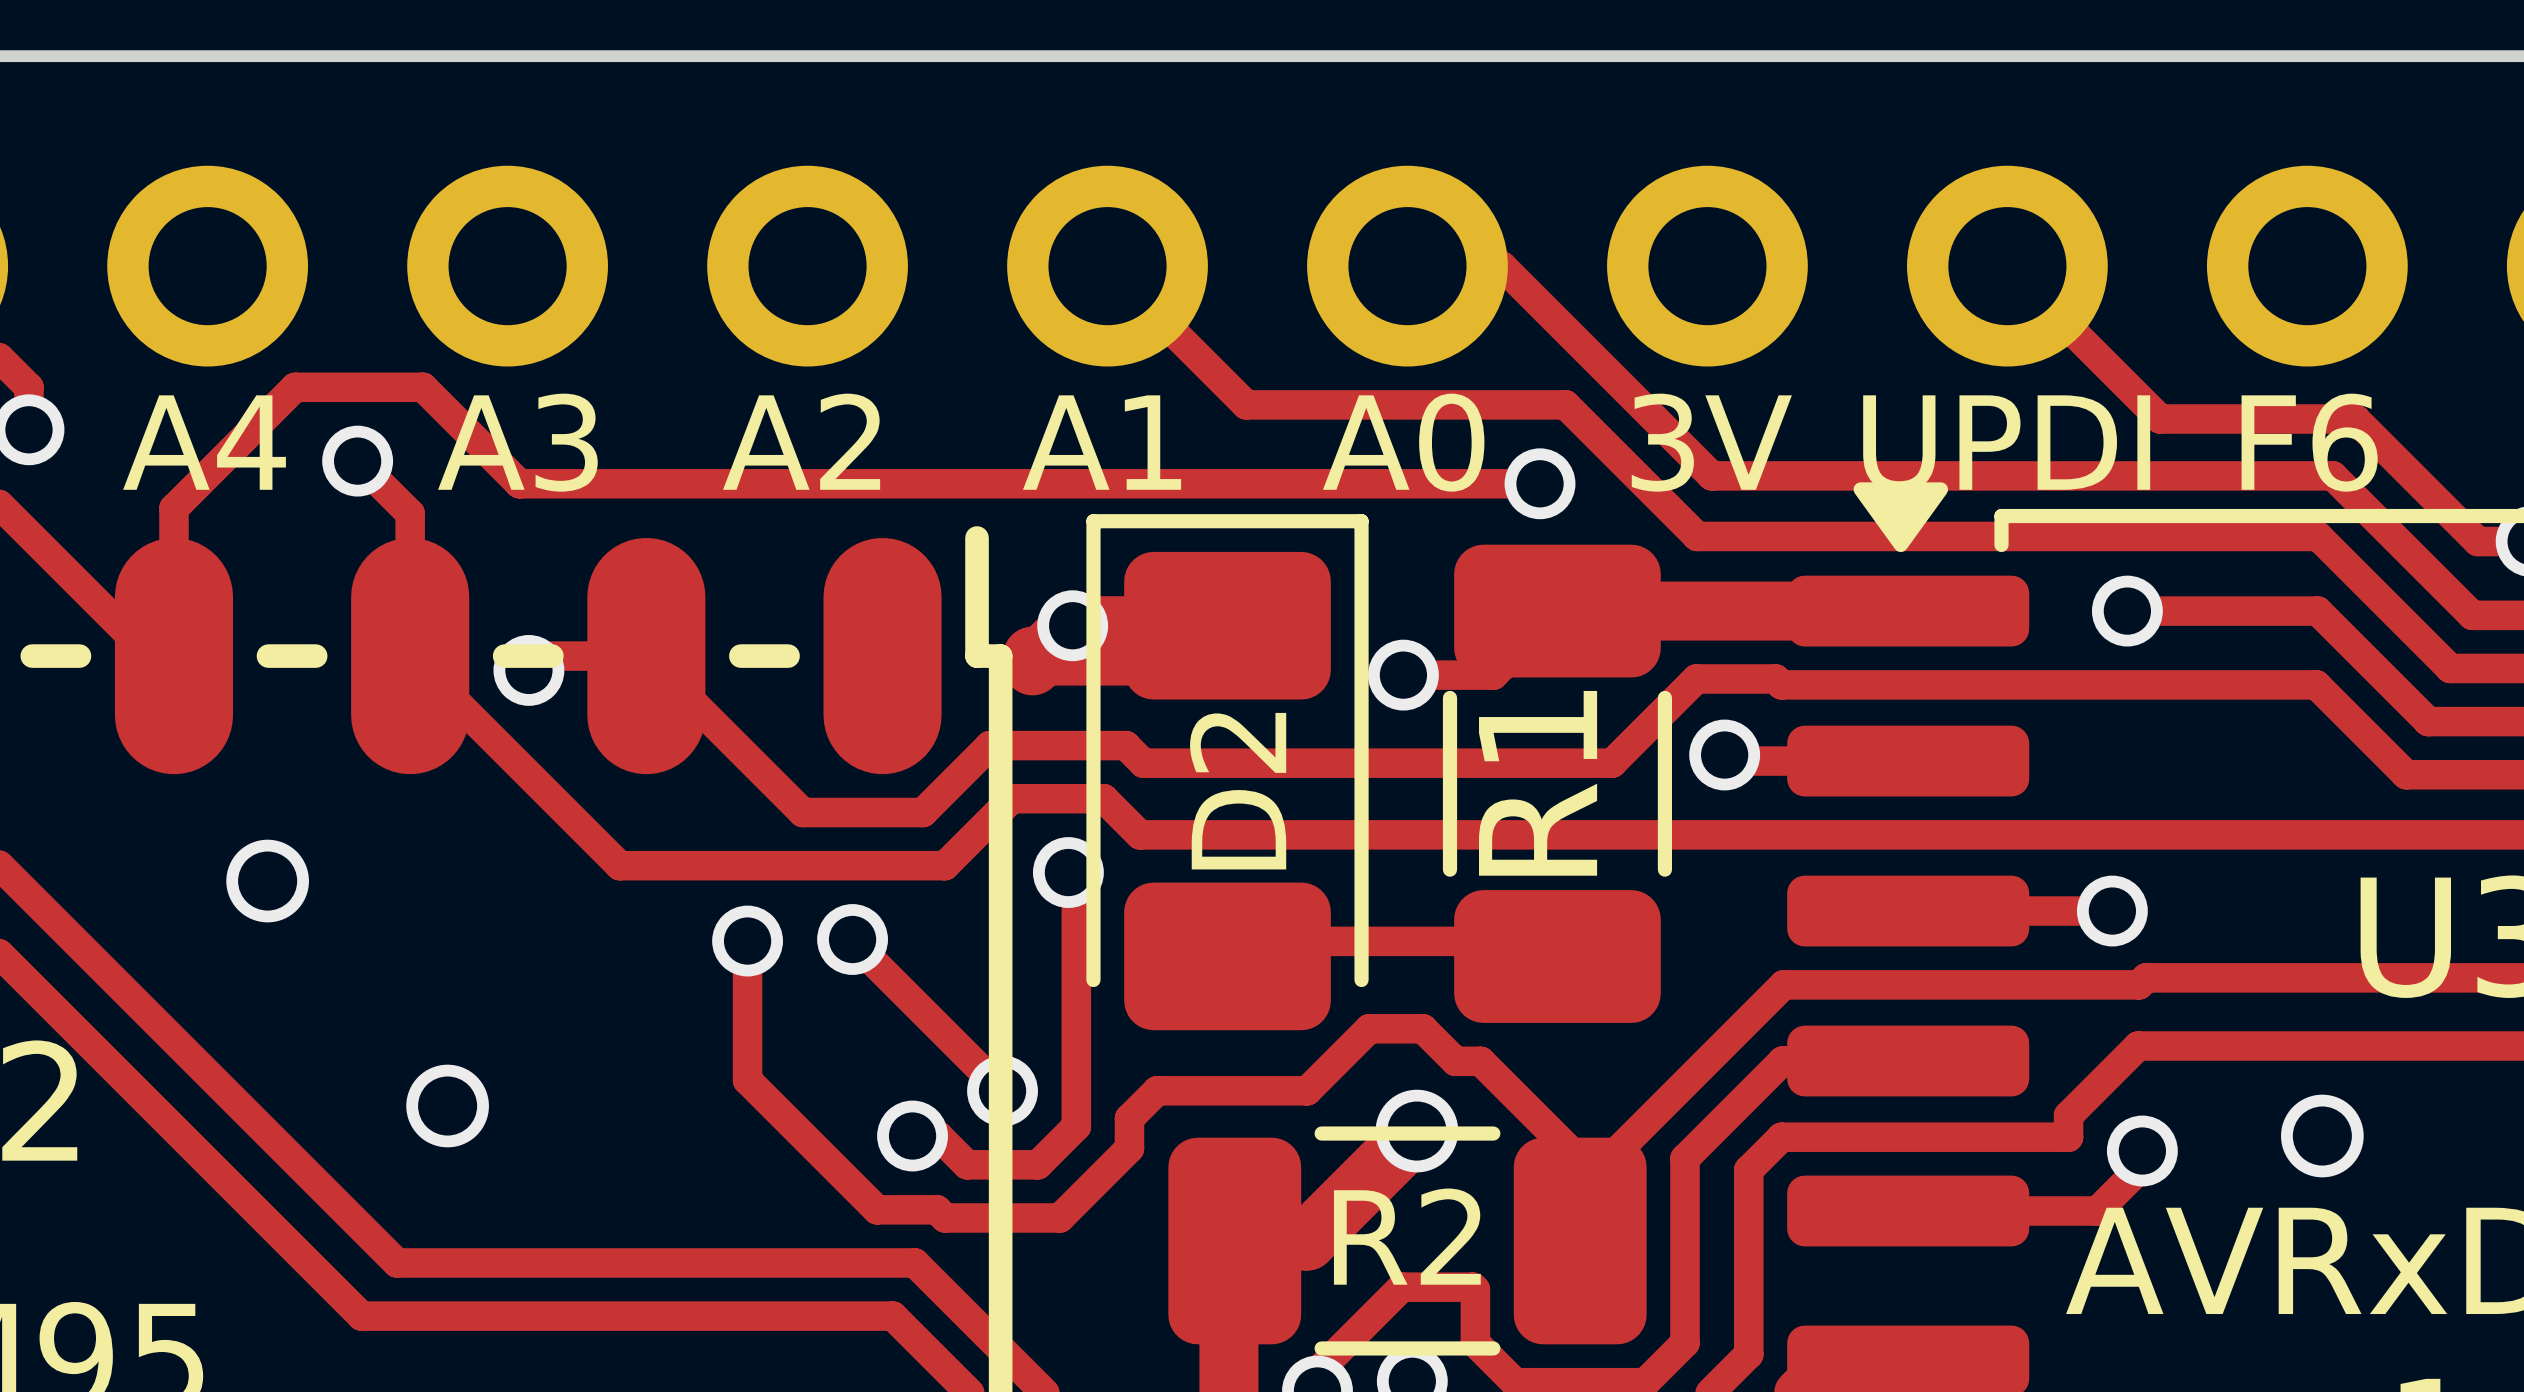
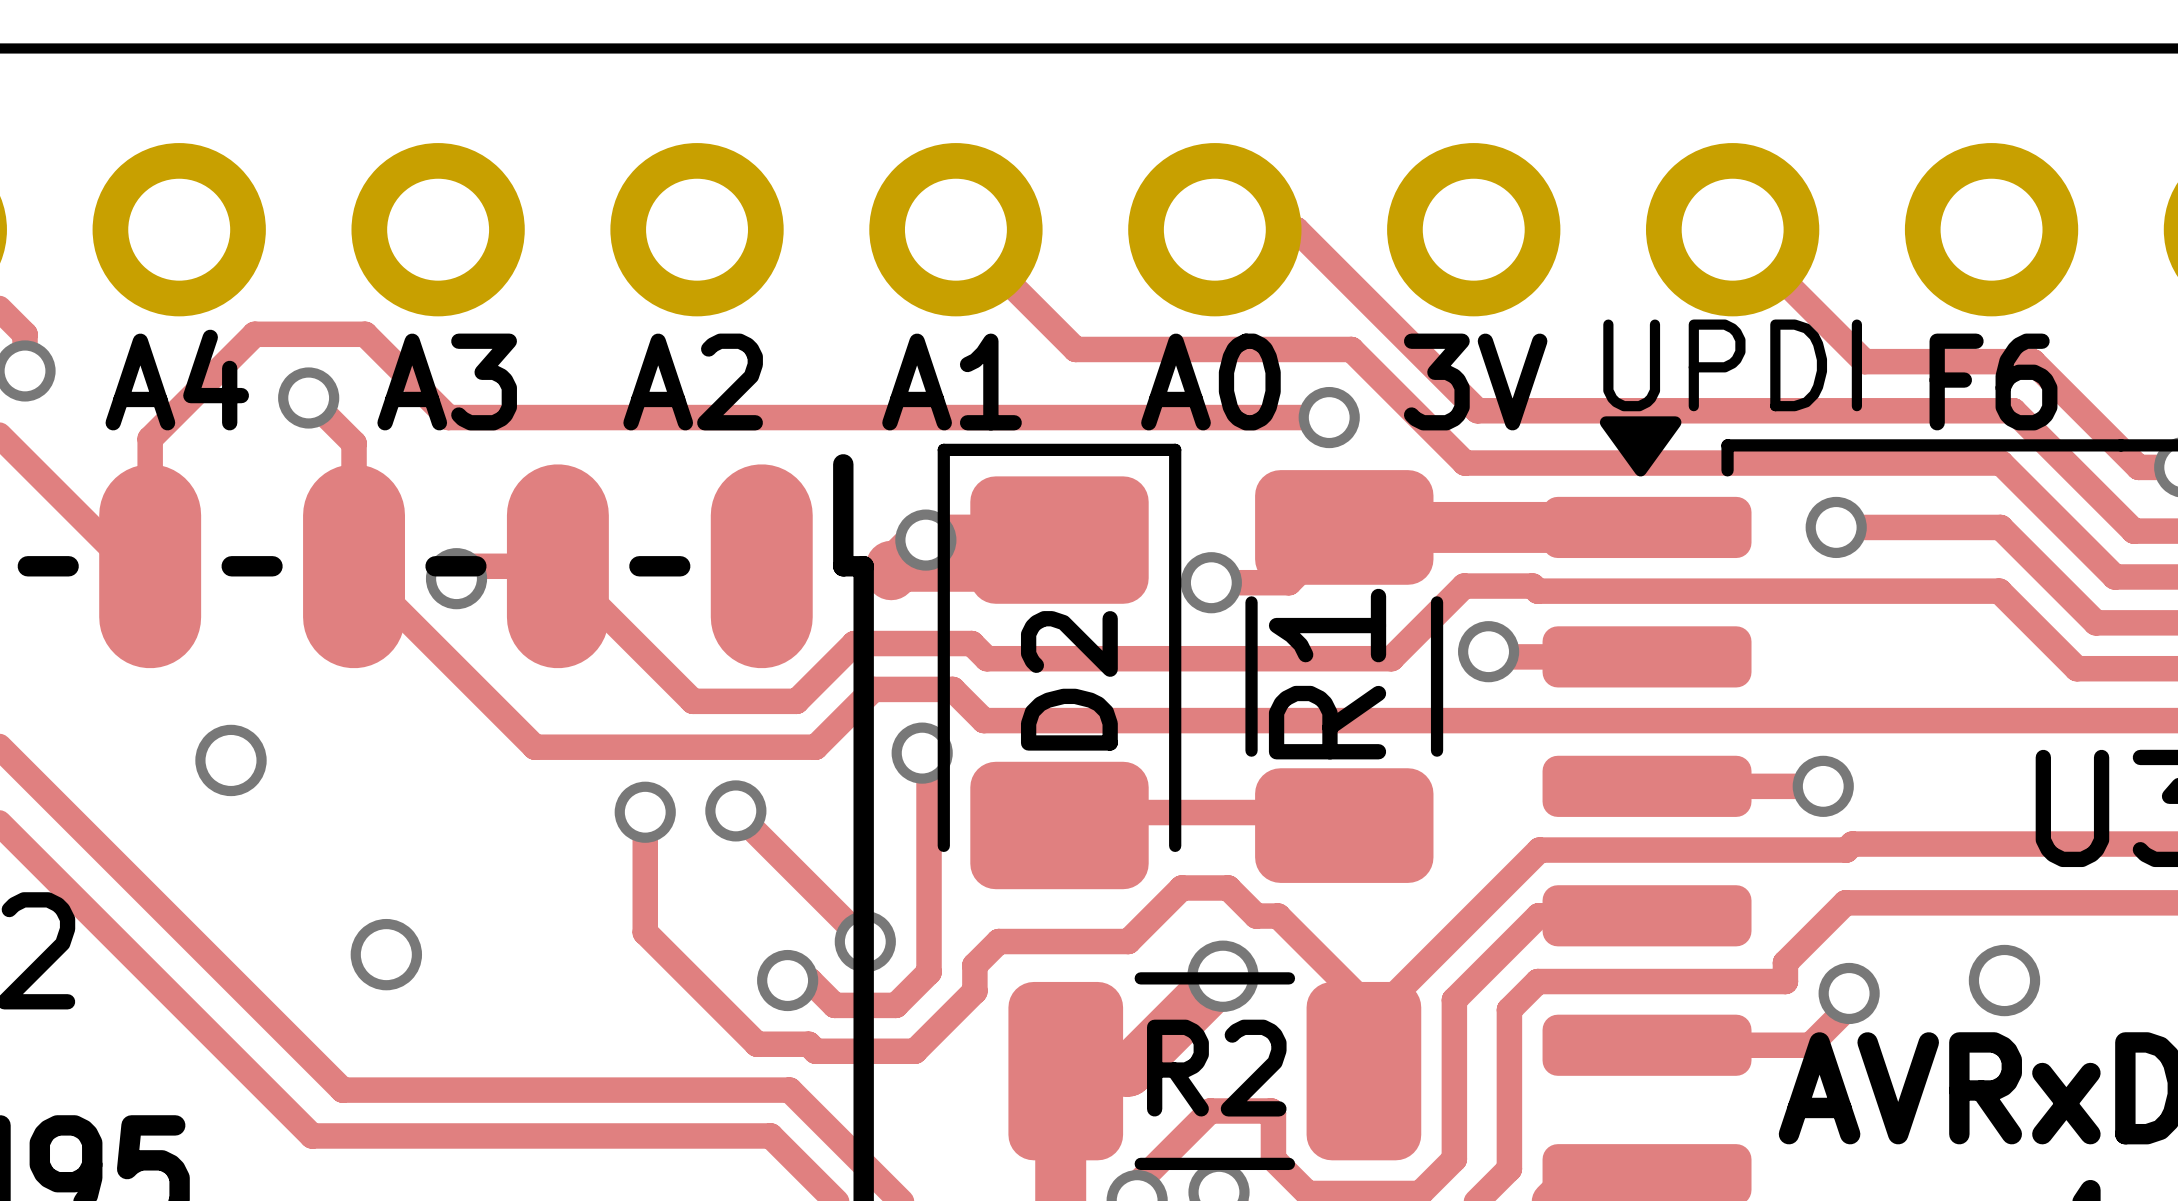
text position: UPDI (2006, 443) -> UPDI (1732, 365)

